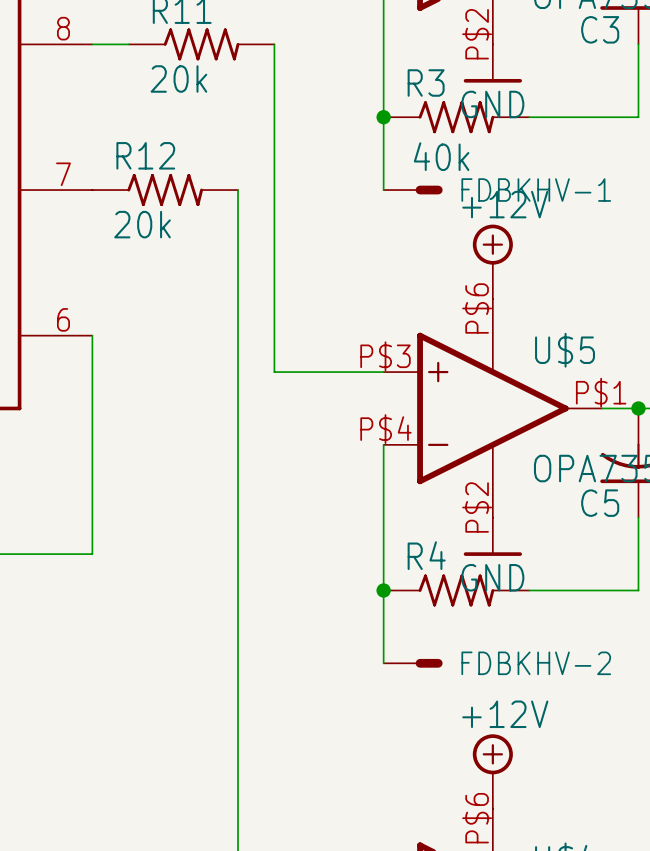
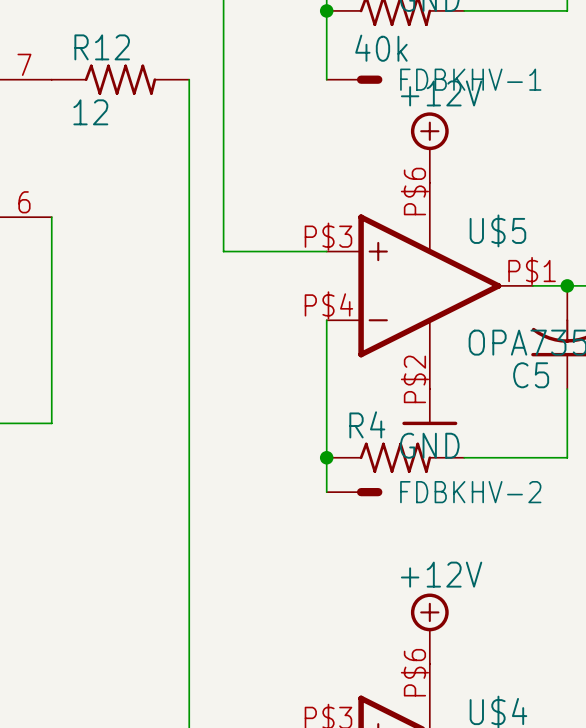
R12 value: 20k (142, 224) -> 12 (90, 112)
wire: (383, 626) (383, 663) -> none
FDBKHV-2 position: (413, 663) -> (354, 492)

